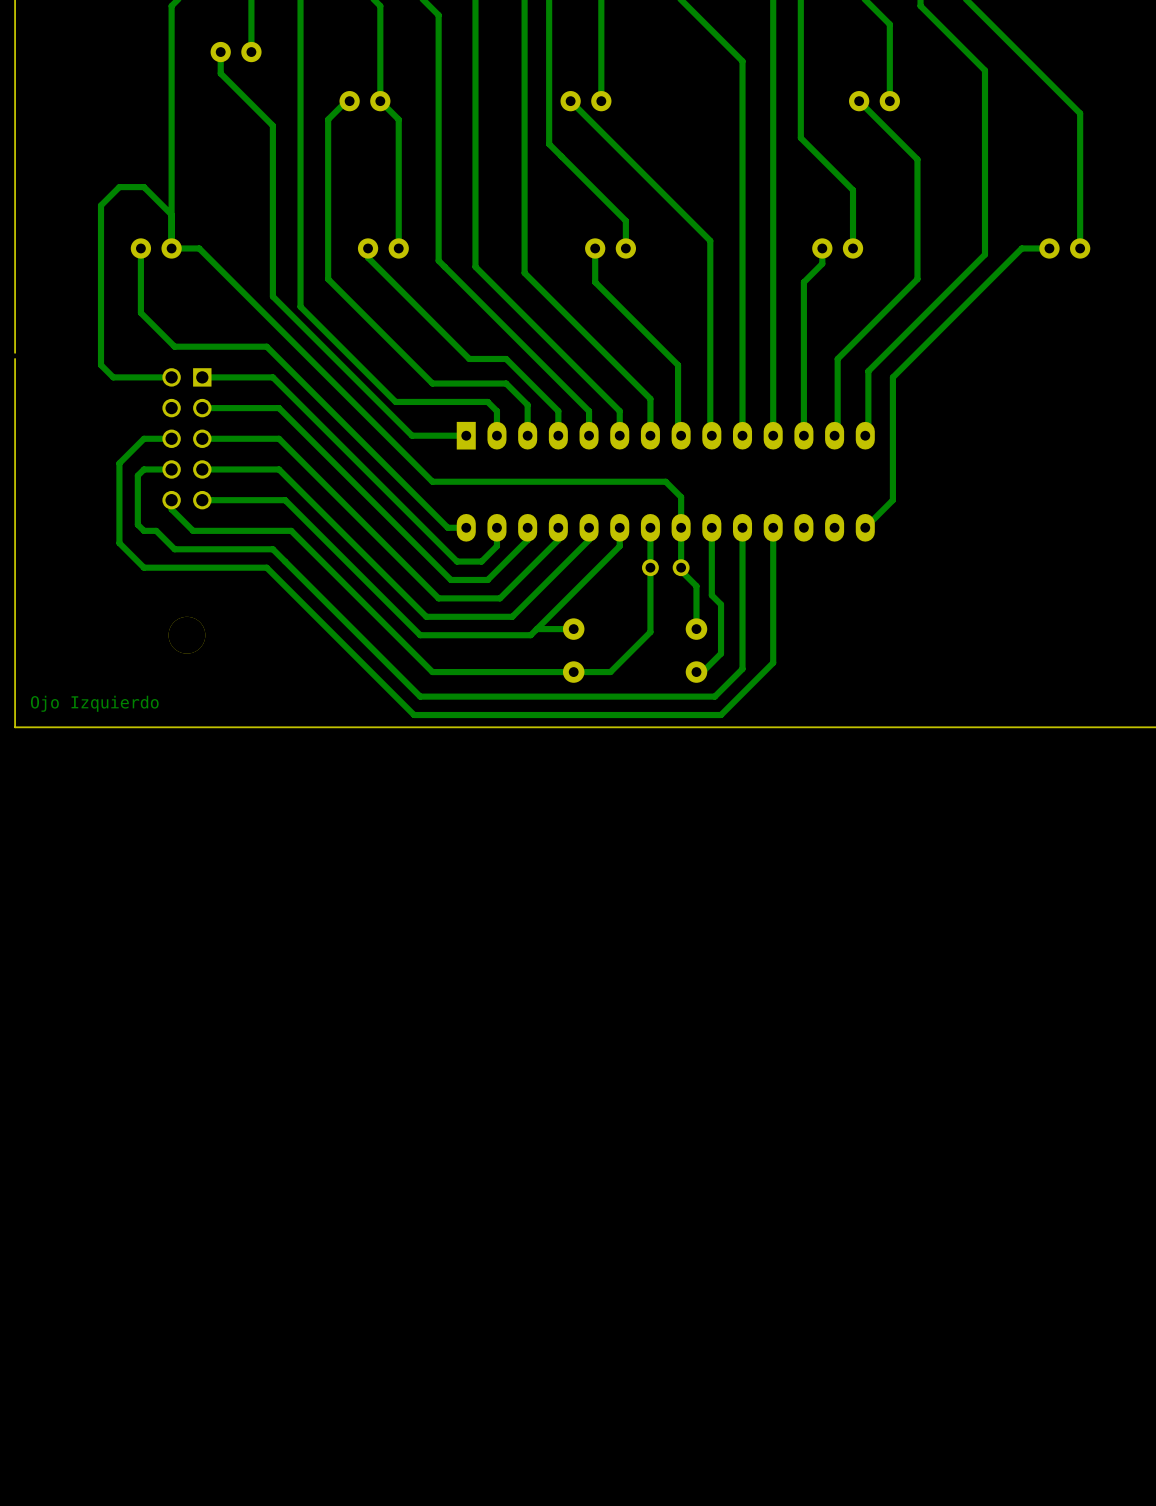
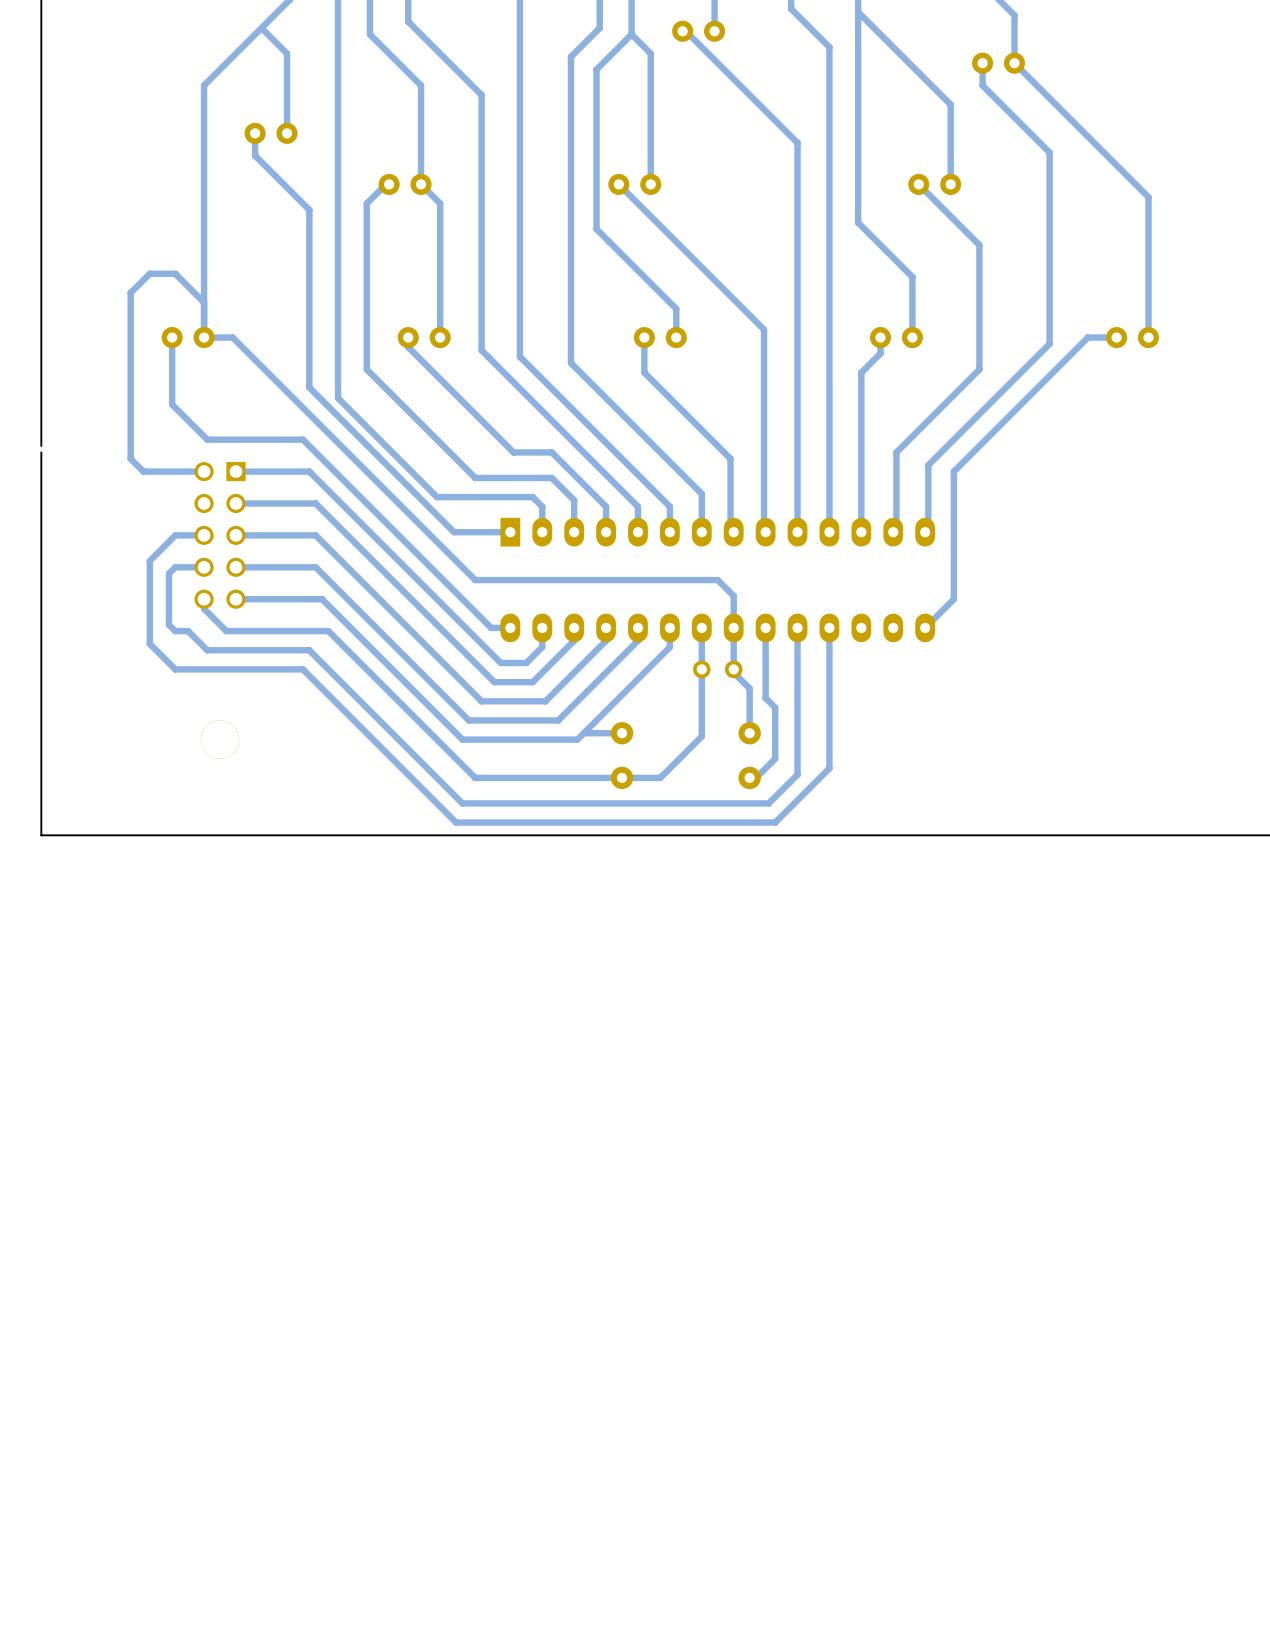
text: Ojo Izquierdo (94, 703) -> none

